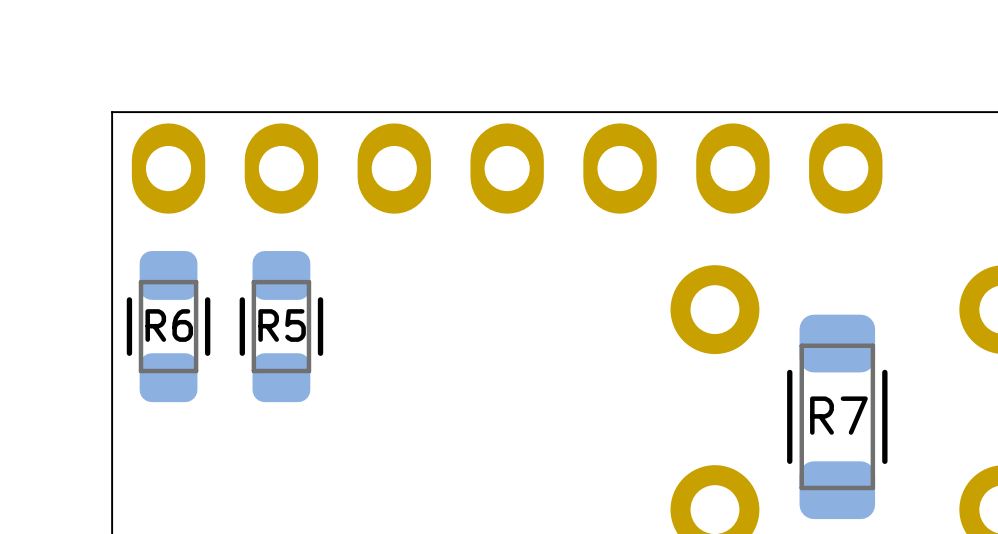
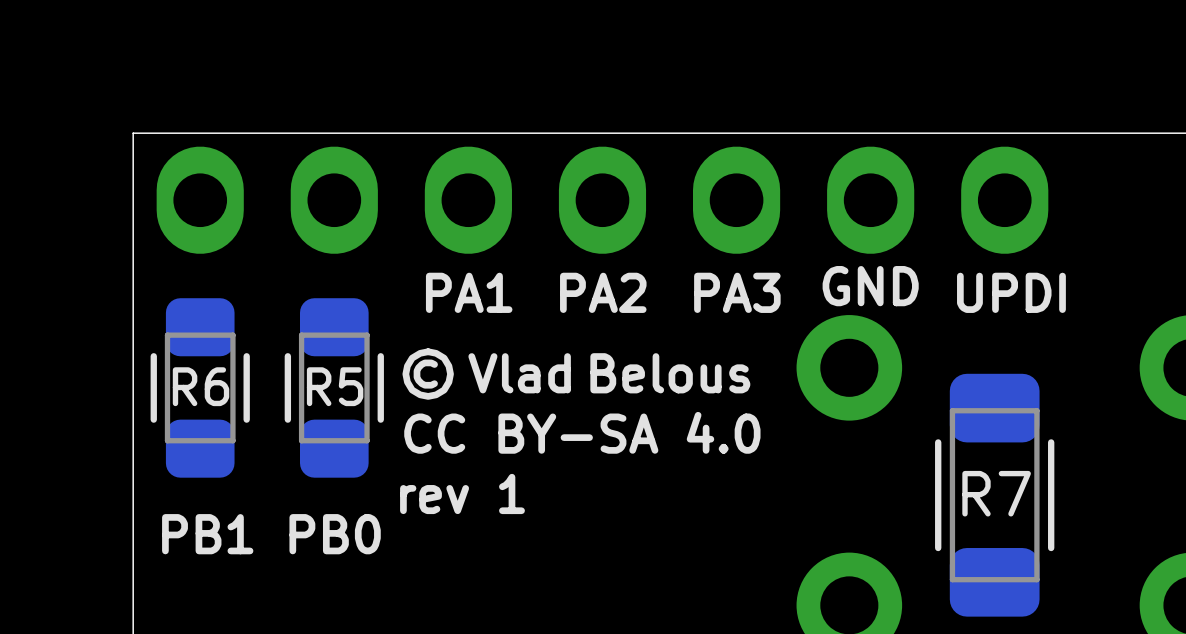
text: none -> GND (870, 286)
text: none -> PA1 (469, 292)
text: none -> PA2 (603, 292)
text: none -> PA3 (737, 292)
text: none -> UPDI (1011, 292)
text: none -> © (428, 374)
text: none -> Vlad (519, 373)
text: none -> Belous (670, 373)
text: none -> CC BY-SA 4.0 (582, 432)
text: none -> rev 1 (462, 493)
text: none -> PB1 (207, 534)
text: none -> PB0 (335, 534)

